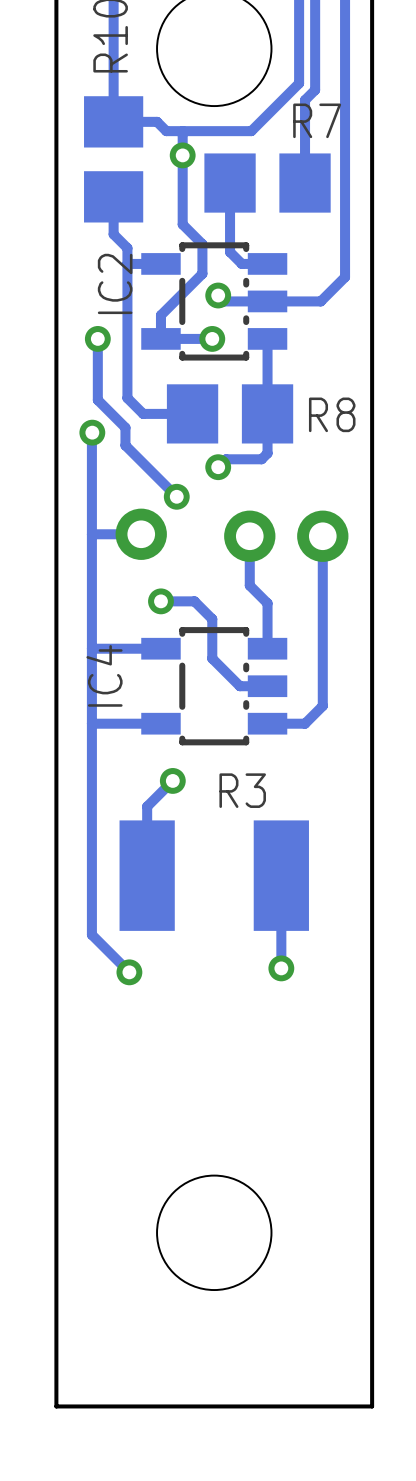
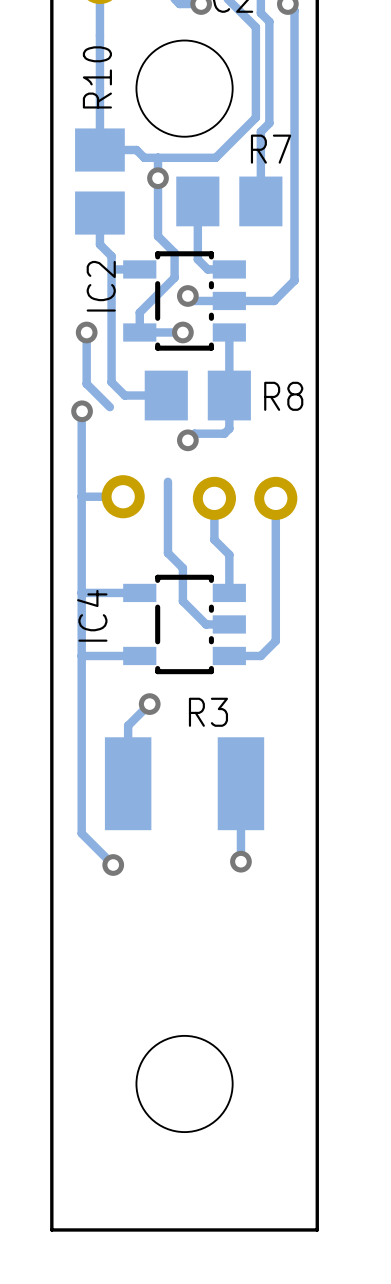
track: (125, 427) (125, 445) (176, 496) -> none
via: (176, 496) -> none
via: (160, 601) -> none
track: (194, 601) (160, 601) -> (167, 553) (167, 481)

